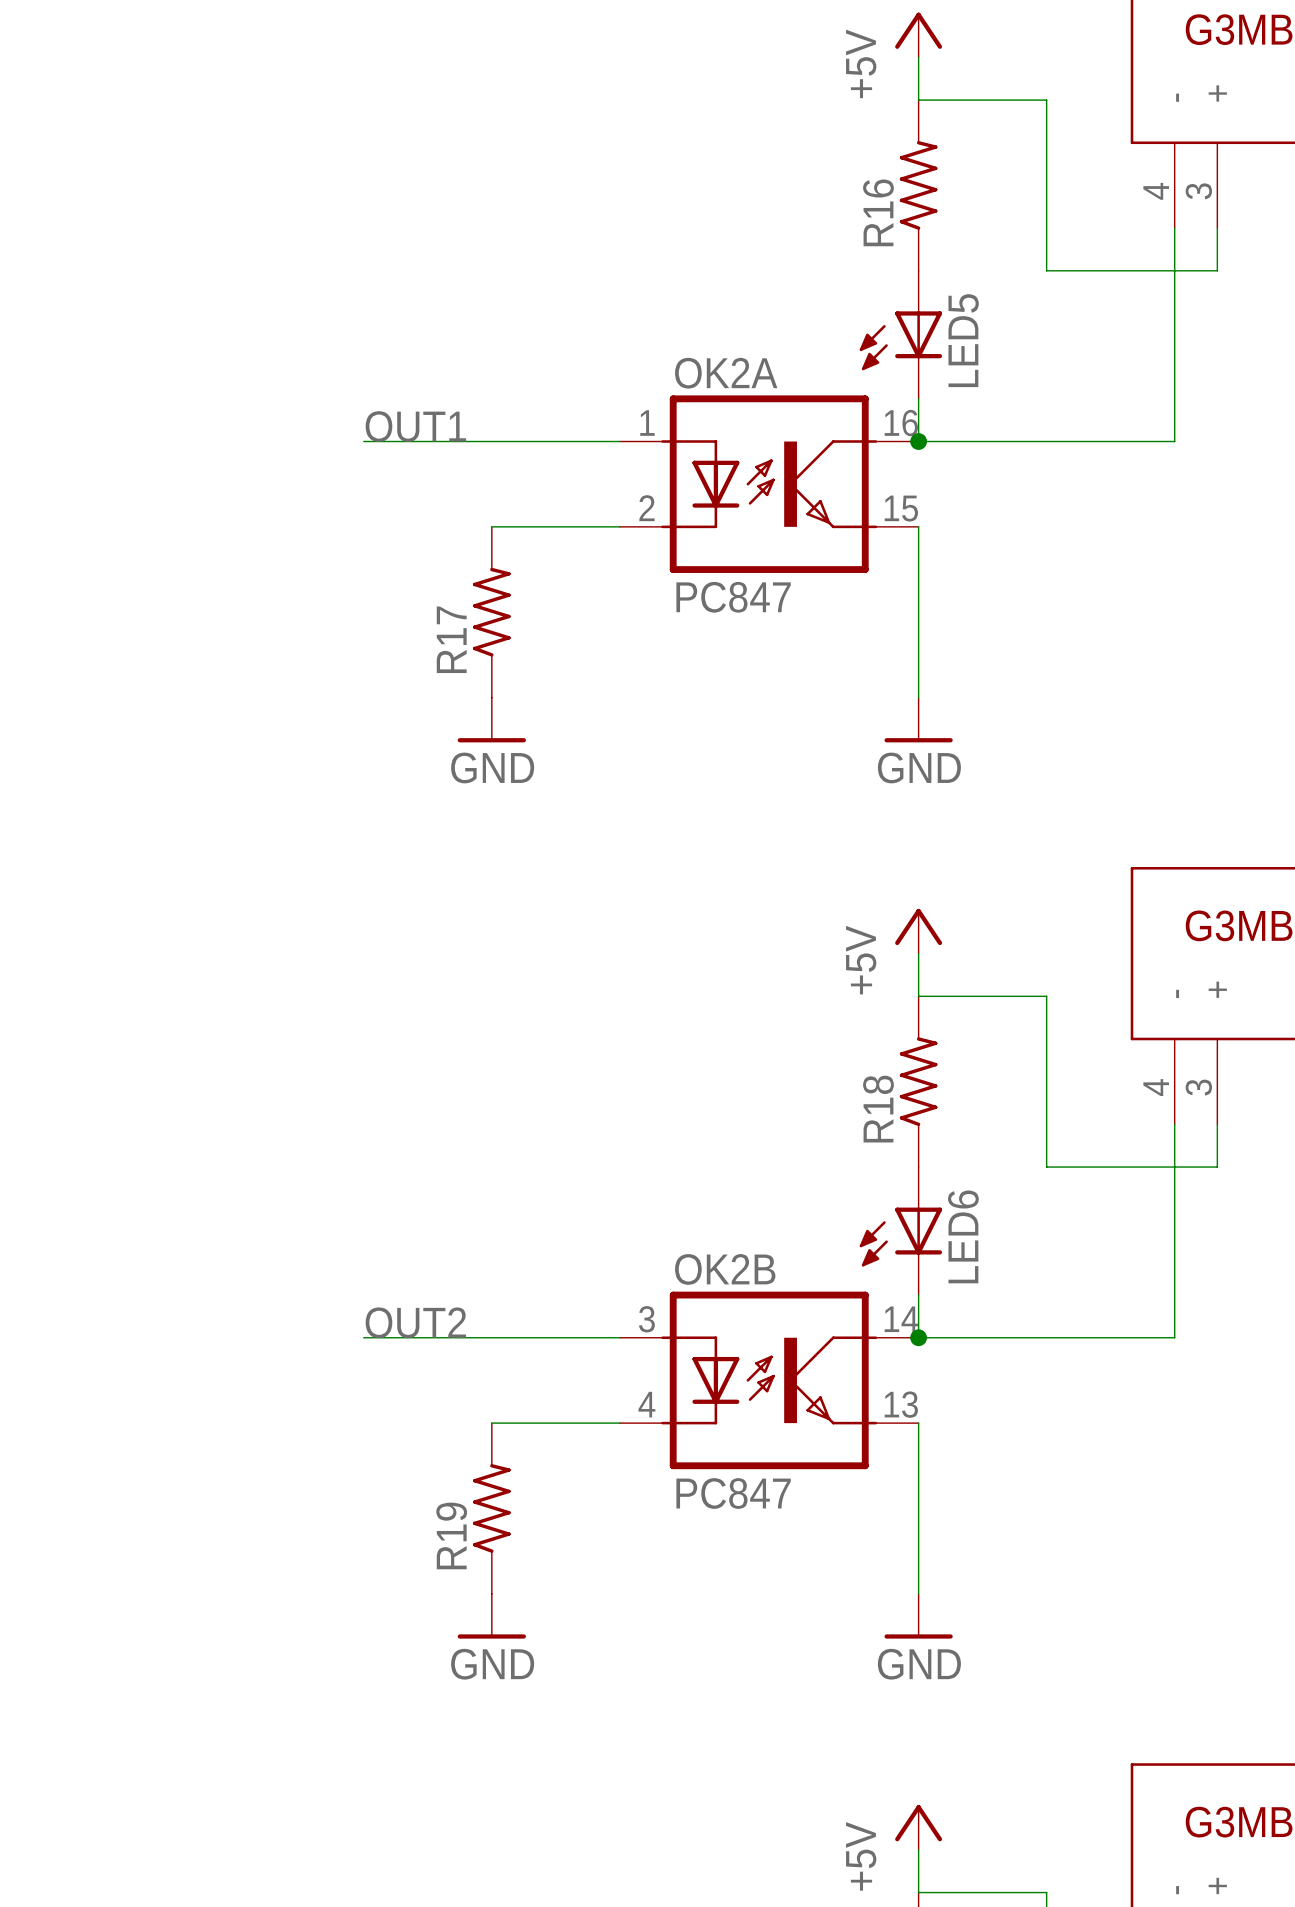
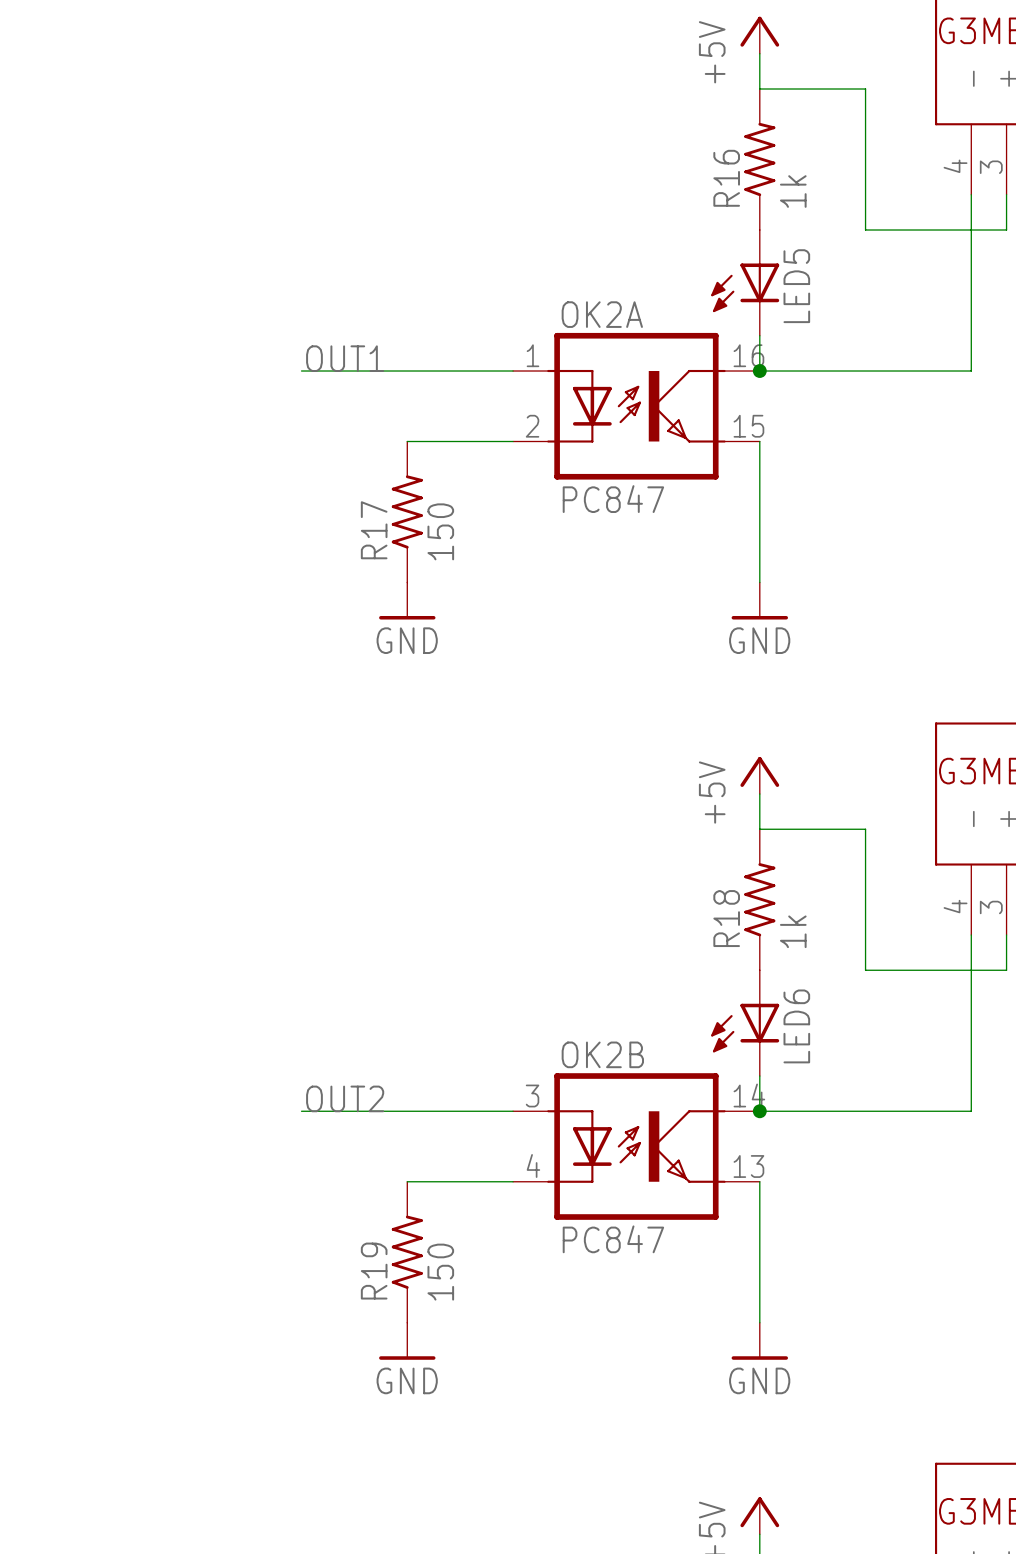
R16 value: none -> 1k (793, 191)
R17 value: none -> 150 (440, 531)
R18 value: none -> 1k (793, 931)
R19 value: none -> 150 (440, 1272)

